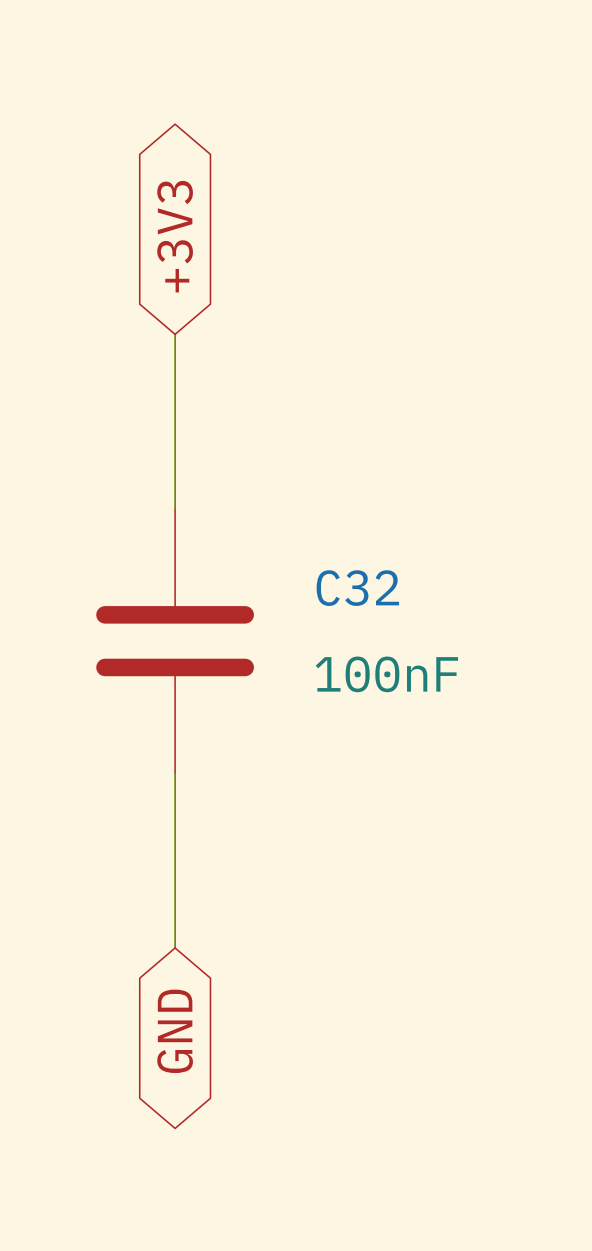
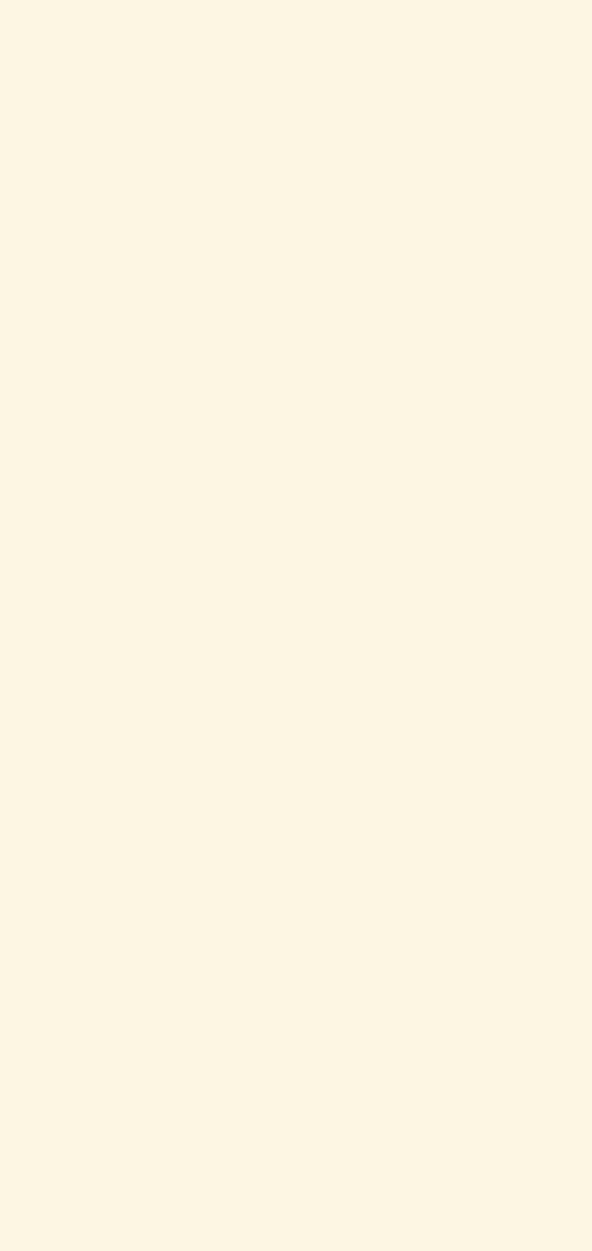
global label: +3V3 (175, 236) -> none
wire: (175, 334) (175, 509) -> none
C32: 100nF (175, 641) -> none
wire: (175, 772) (175, 947) -> none
global label: GND (175, 1031) -> none

